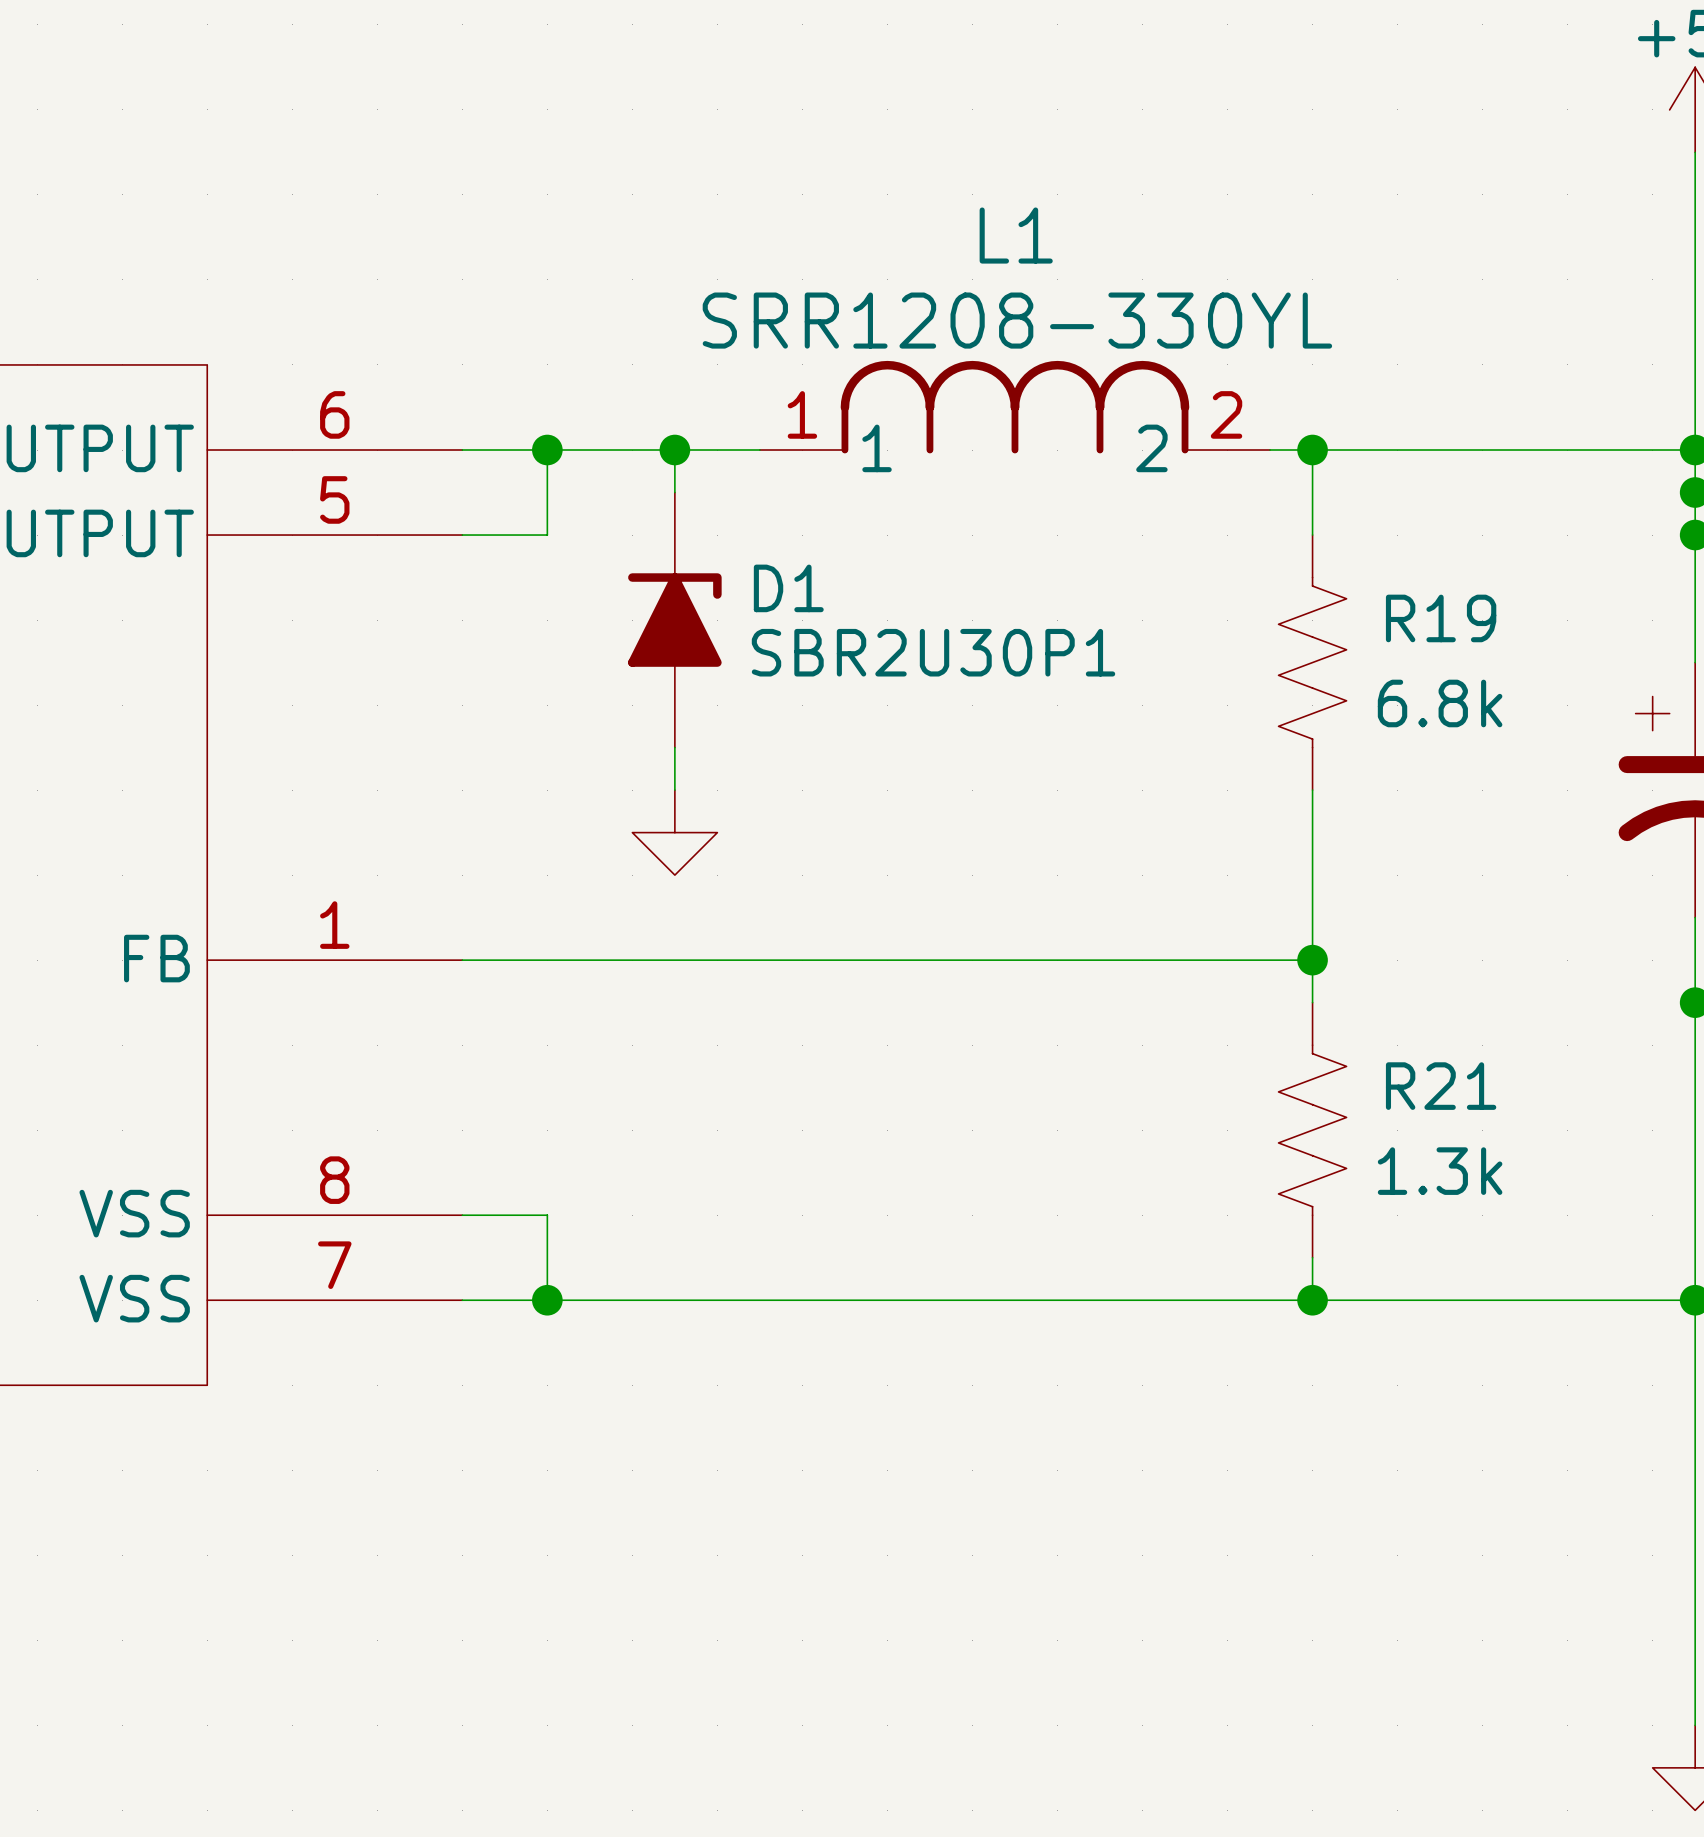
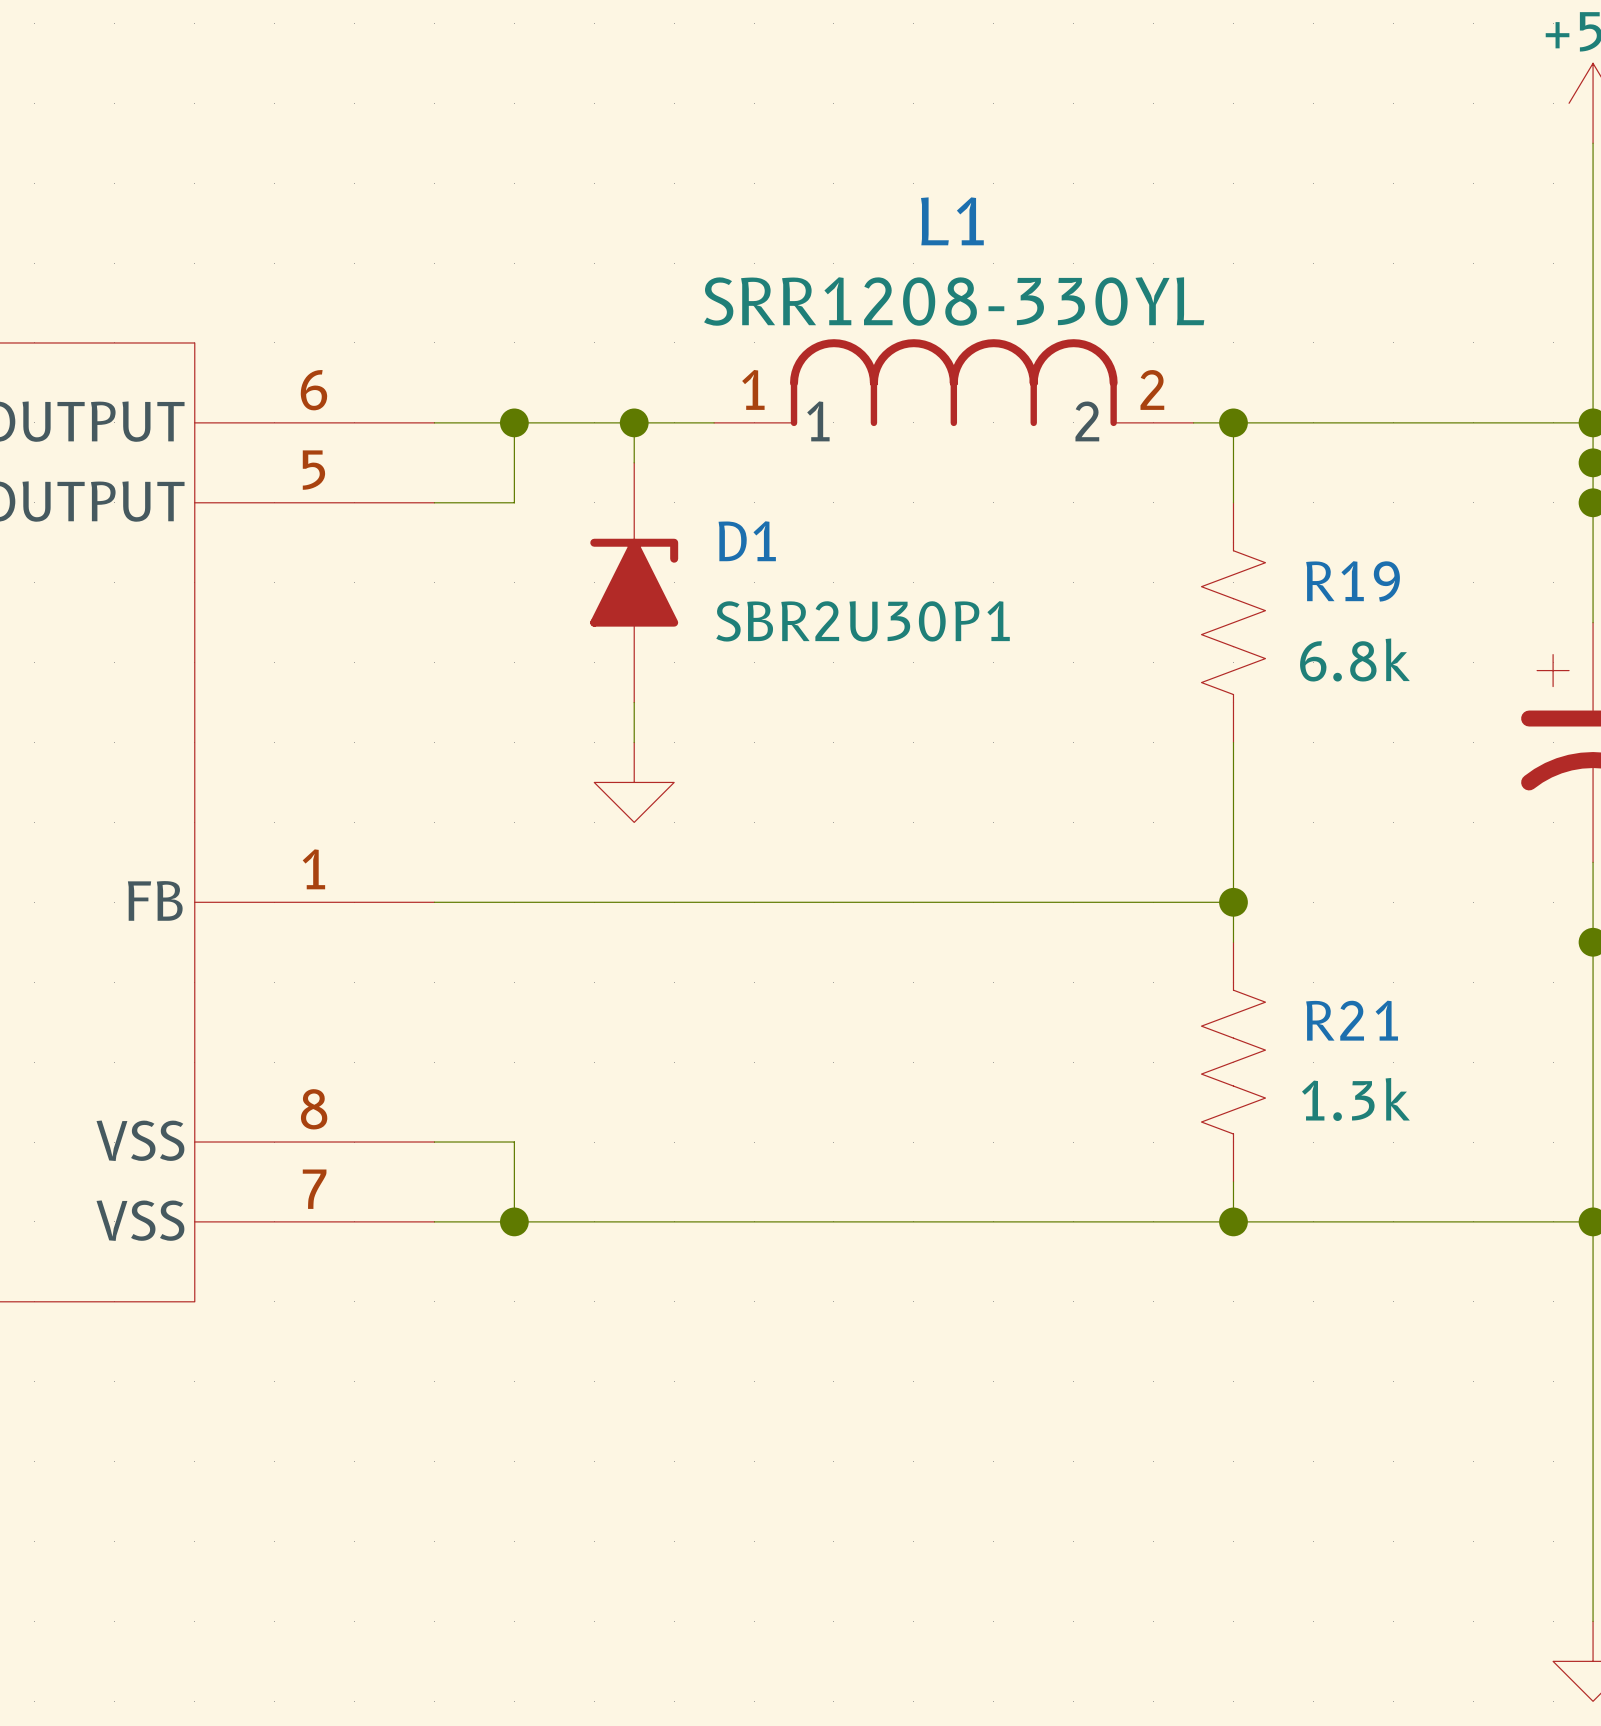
D1 name position: D1 (788, 588) -> D1 (747, 541)
D1 value position: SBR2U30P1 (933, 652) -> SBR2U30P1 (863, 621)

